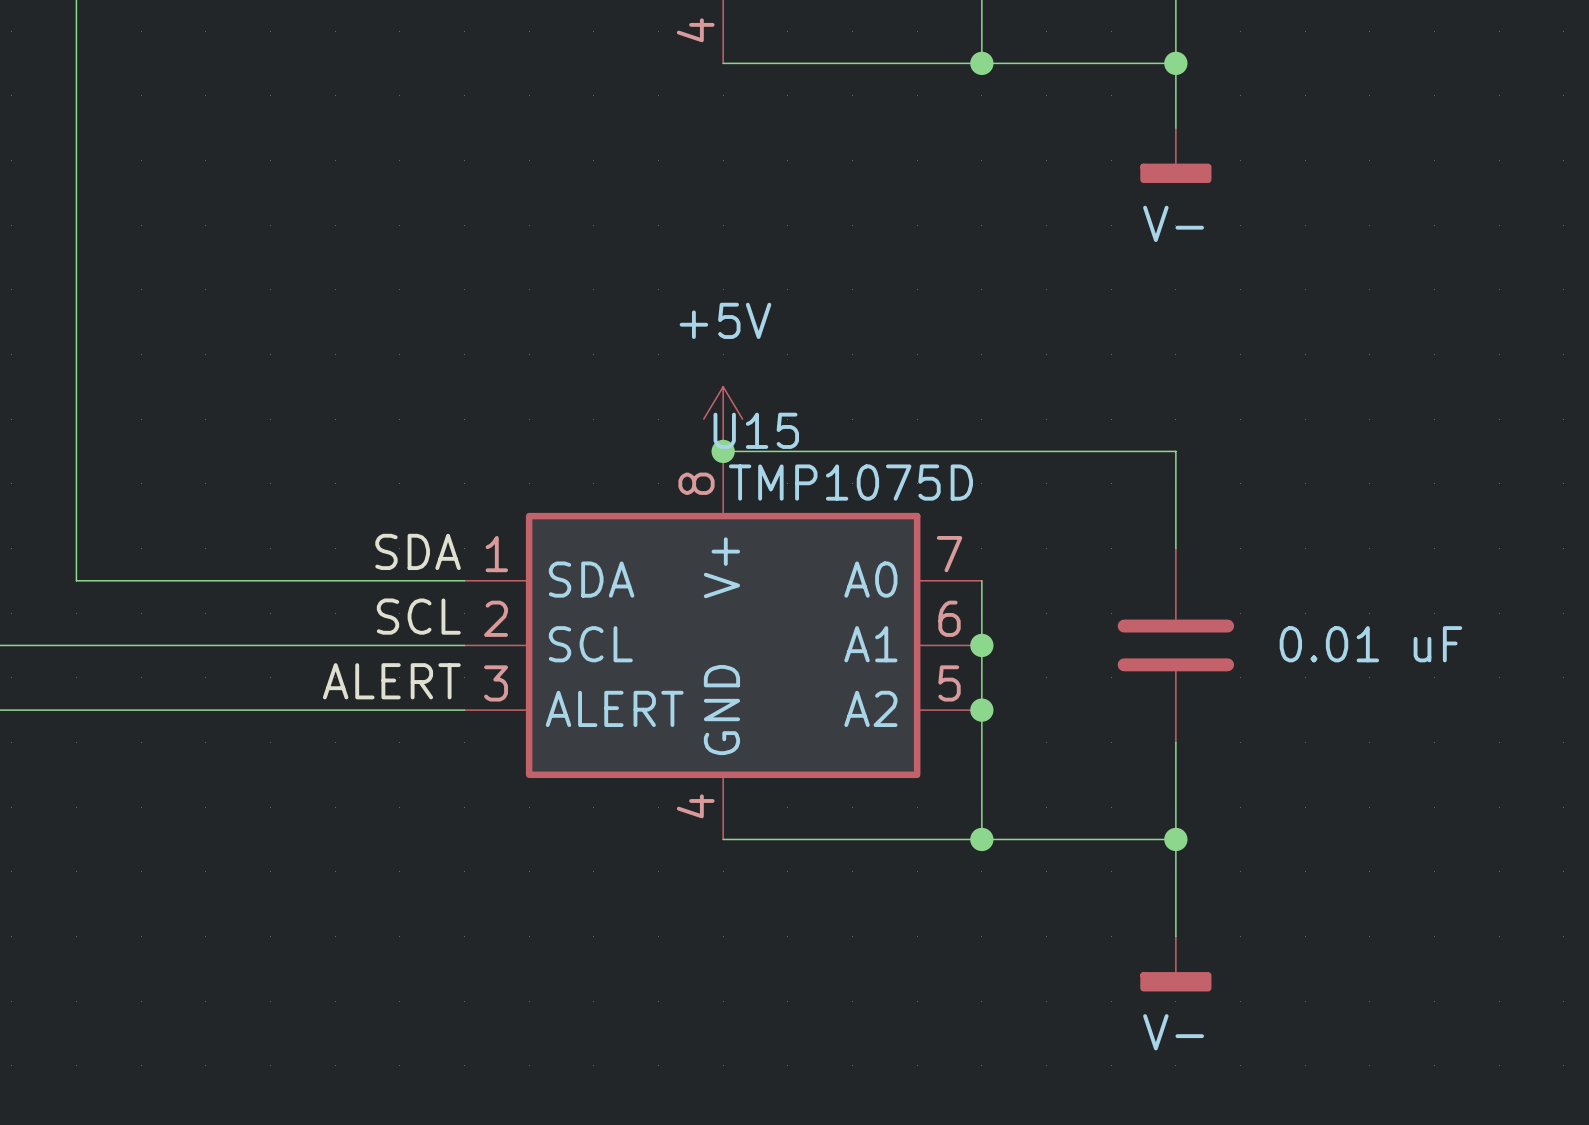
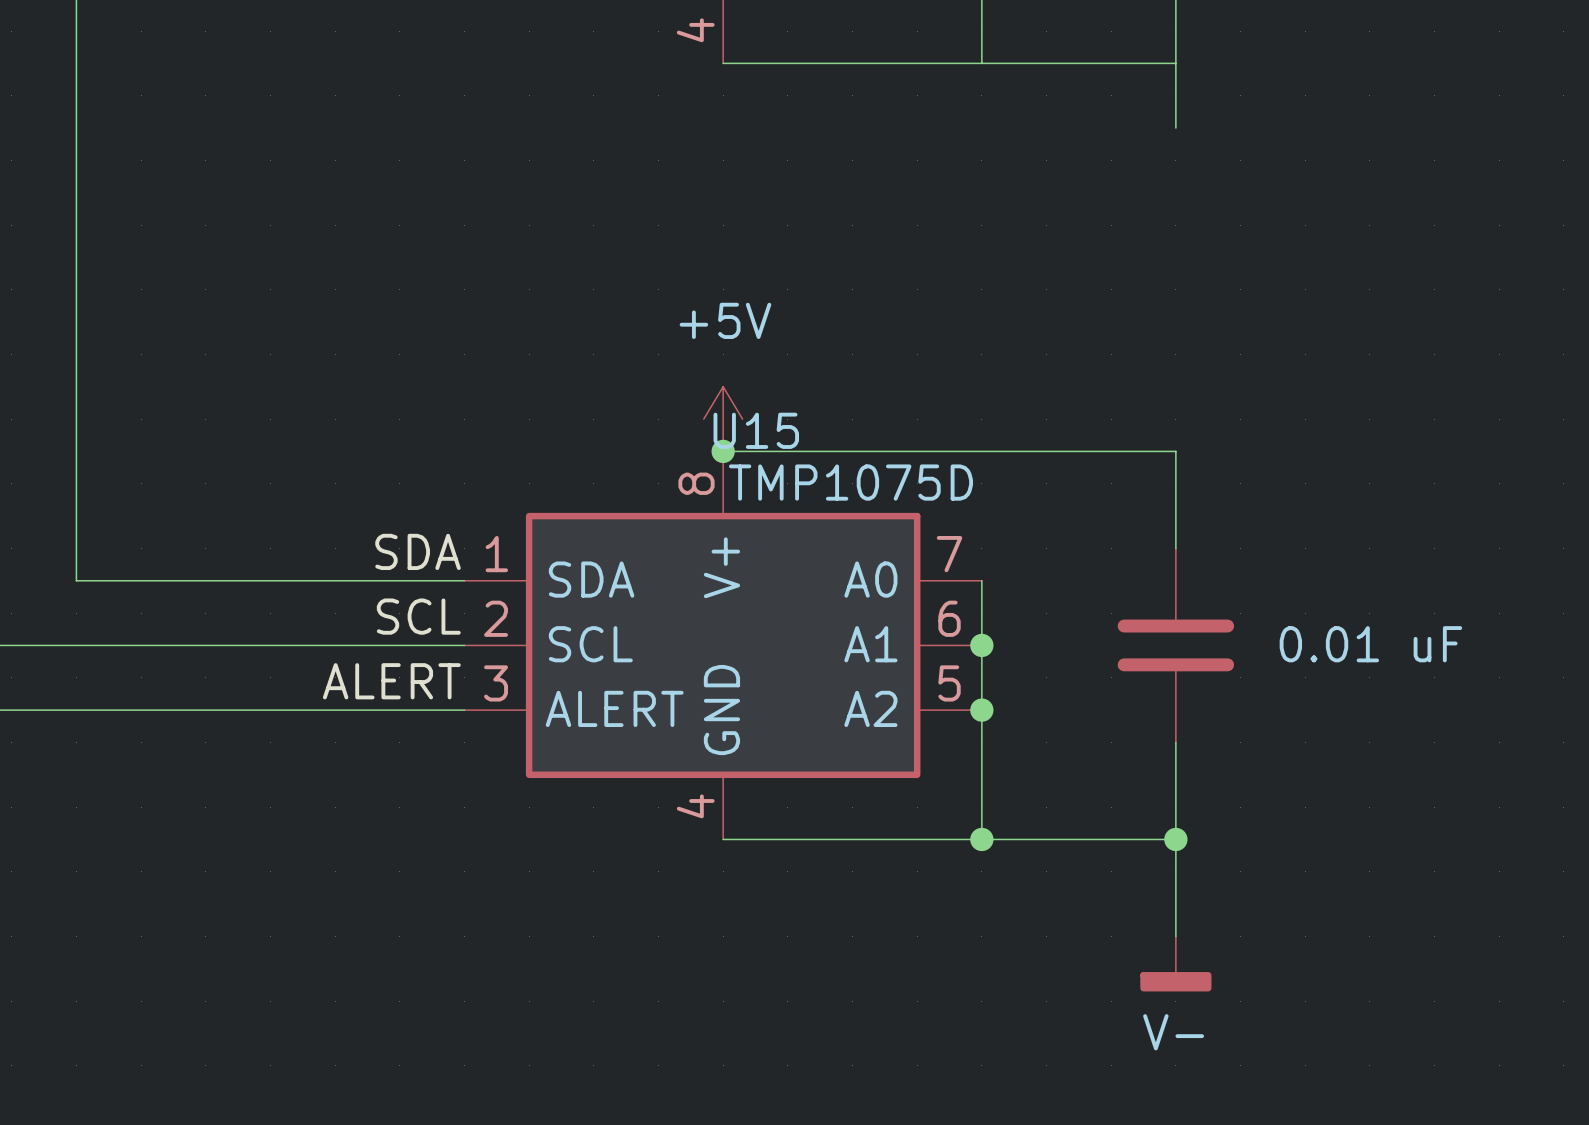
junction: (981, 63) -> none
junction: (1175, 63) -> none
power symbol: V- (1175, 155) -> none

